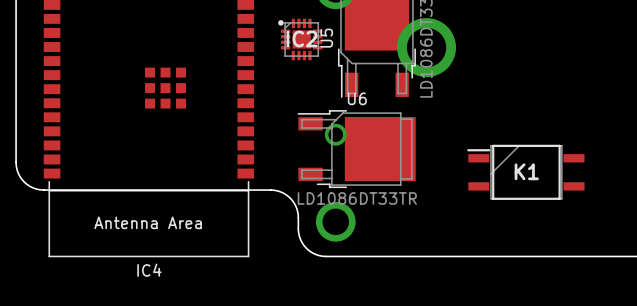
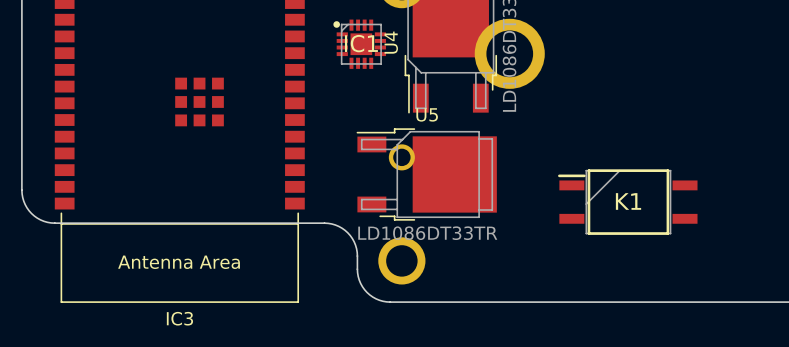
IC2 name: IC2 (302, 38) -> IC1 (361, 43)
U5 name: U5 (326, 38) -> U4 (391, 42)
U6 name: U6 (357, 98) -> U5 (427, 114)
IC4 name: IC4 (149, 270) -> IC3 (179, 318)

